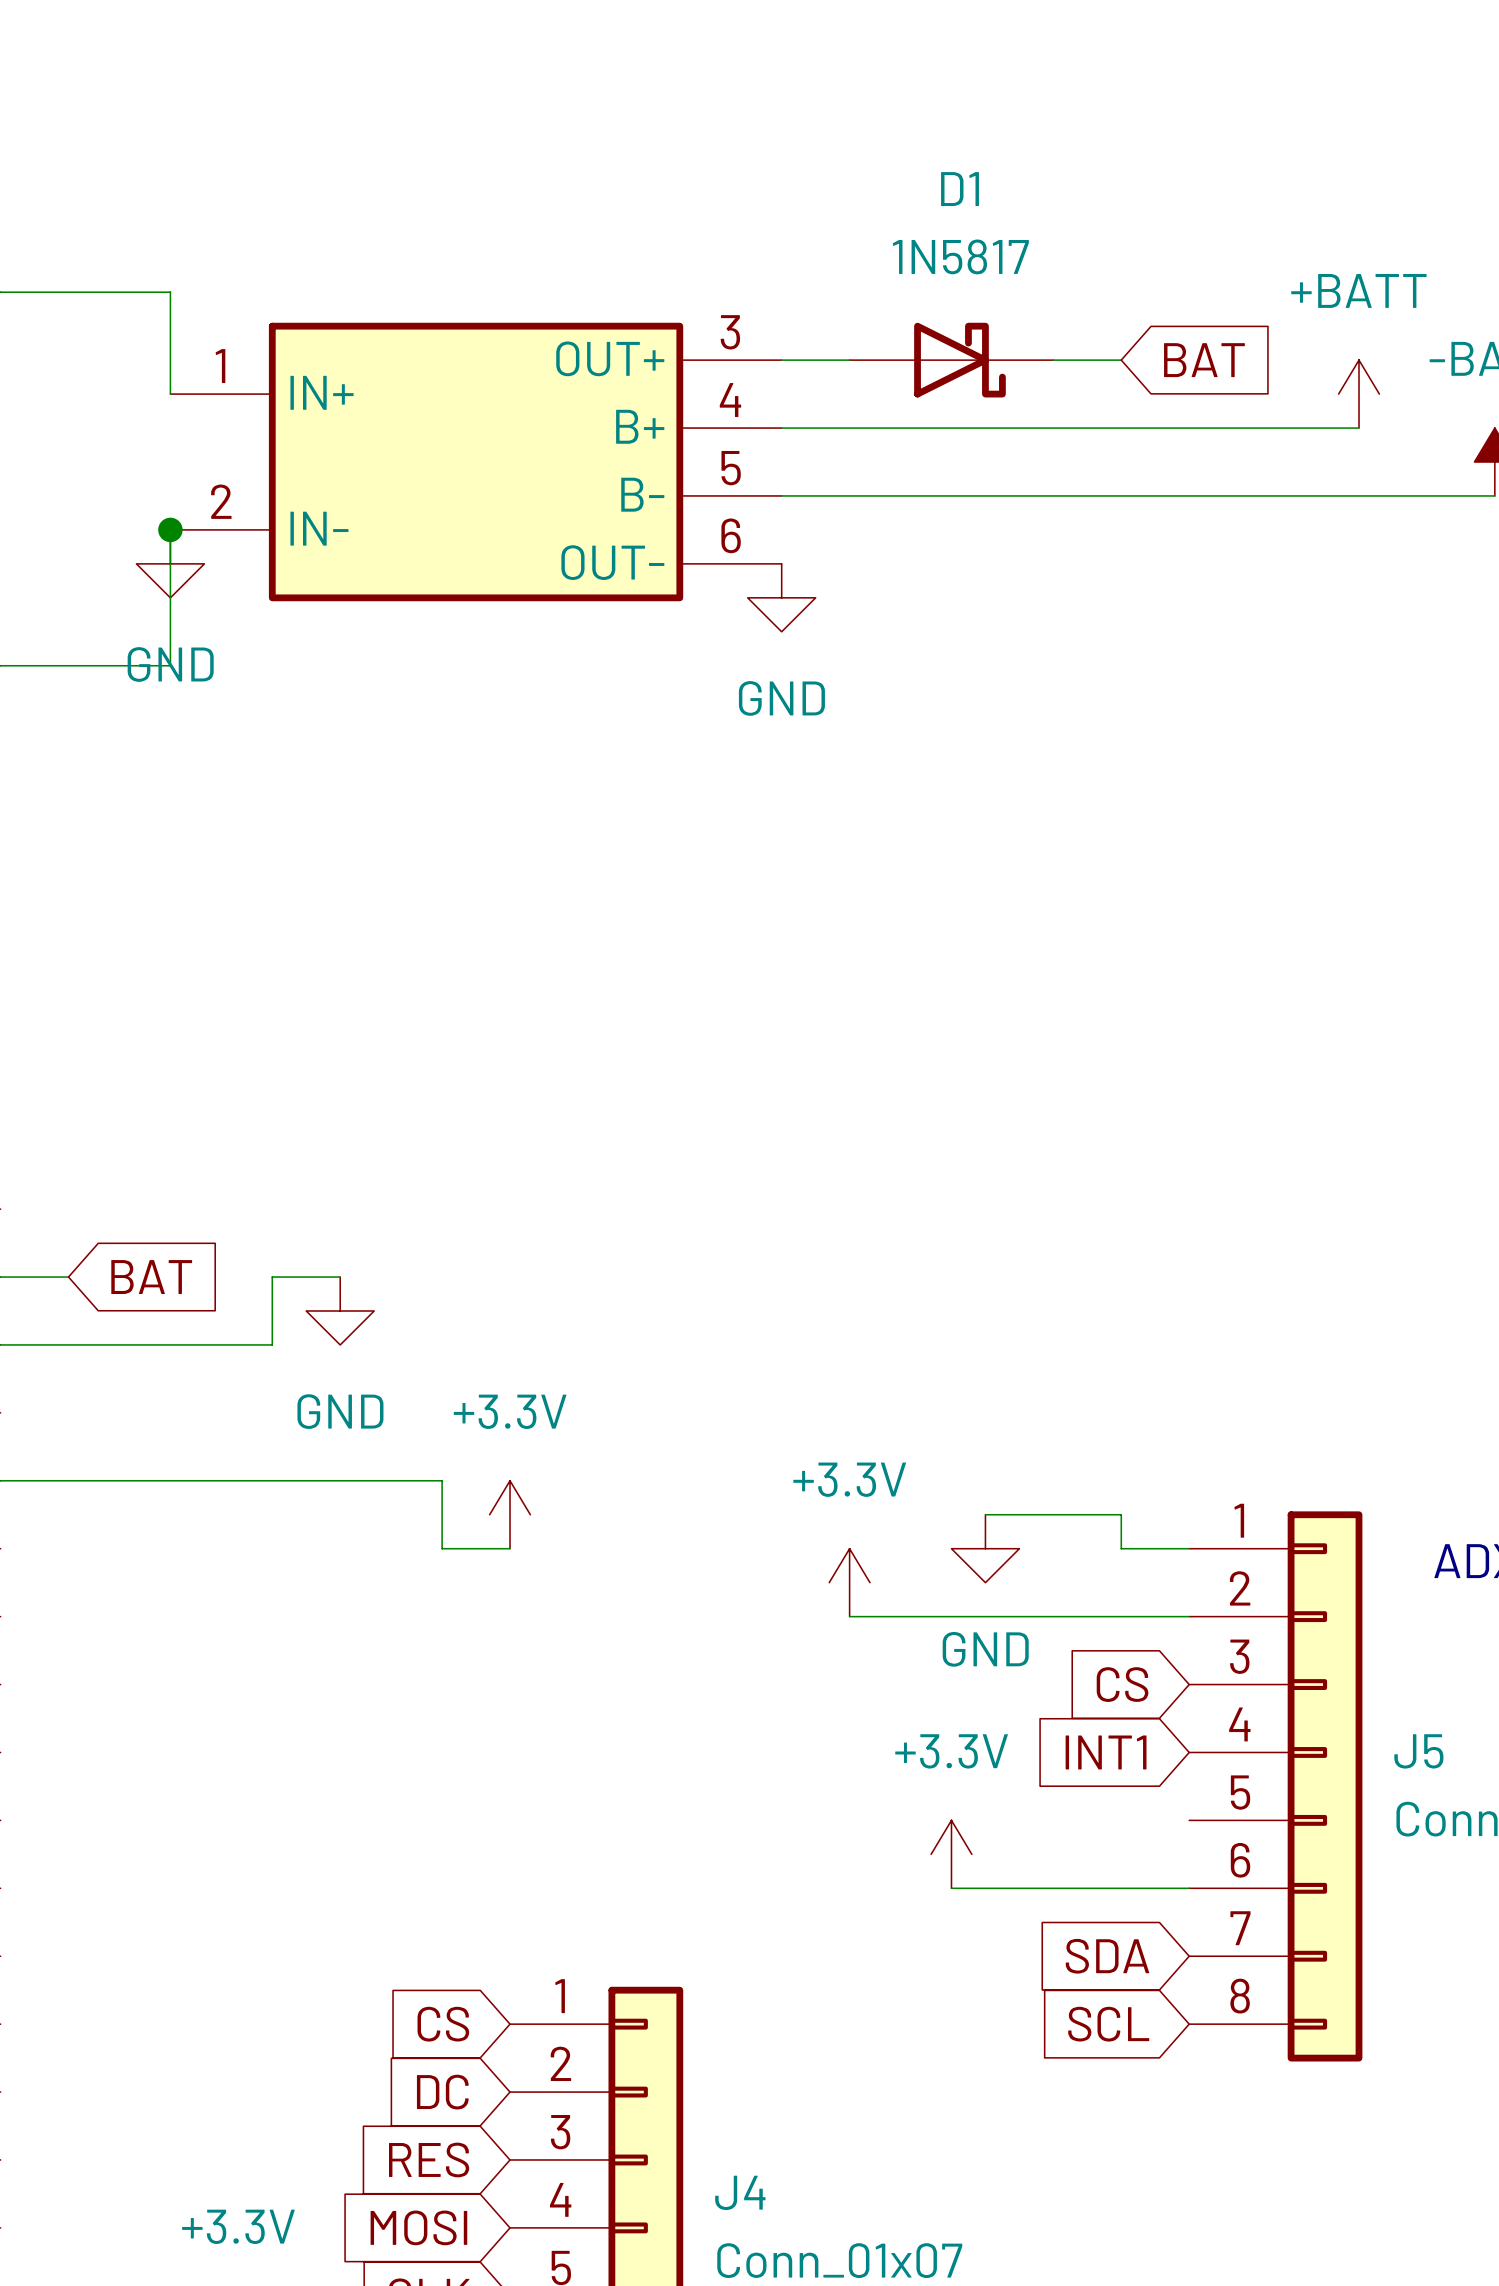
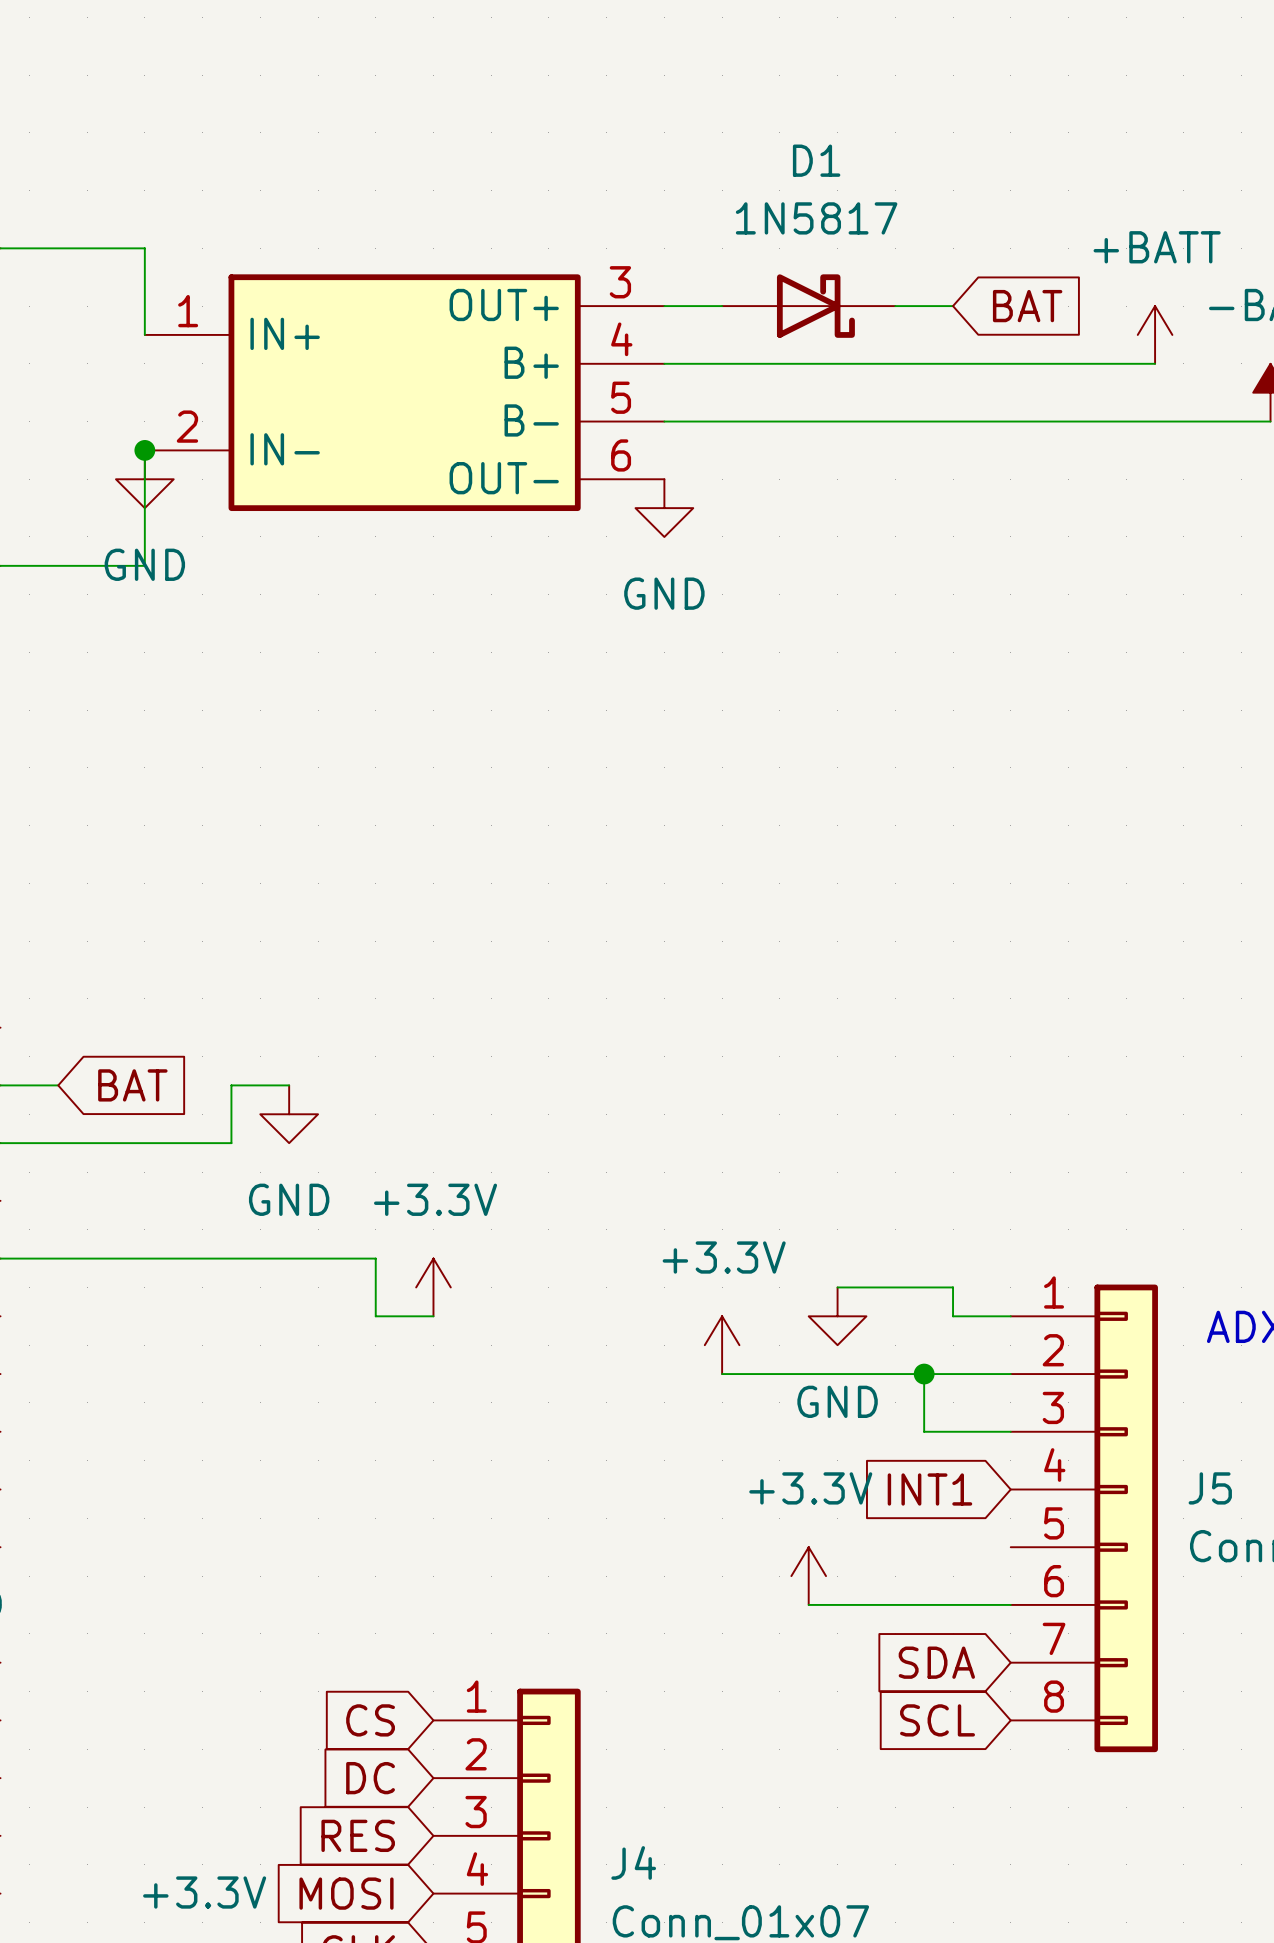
wire: none -> (924, 1374) (924, 1431) (1010, 1431)
junction: none -> (924, 1374)
global label: CS (1122, 1684) -> none

